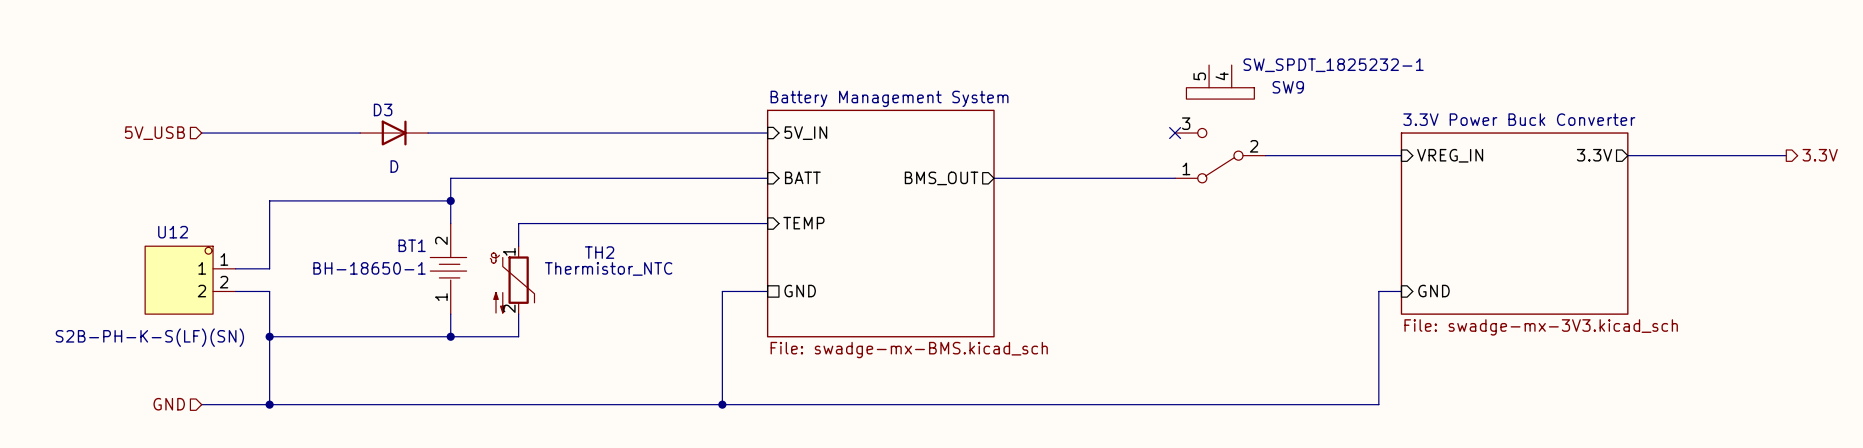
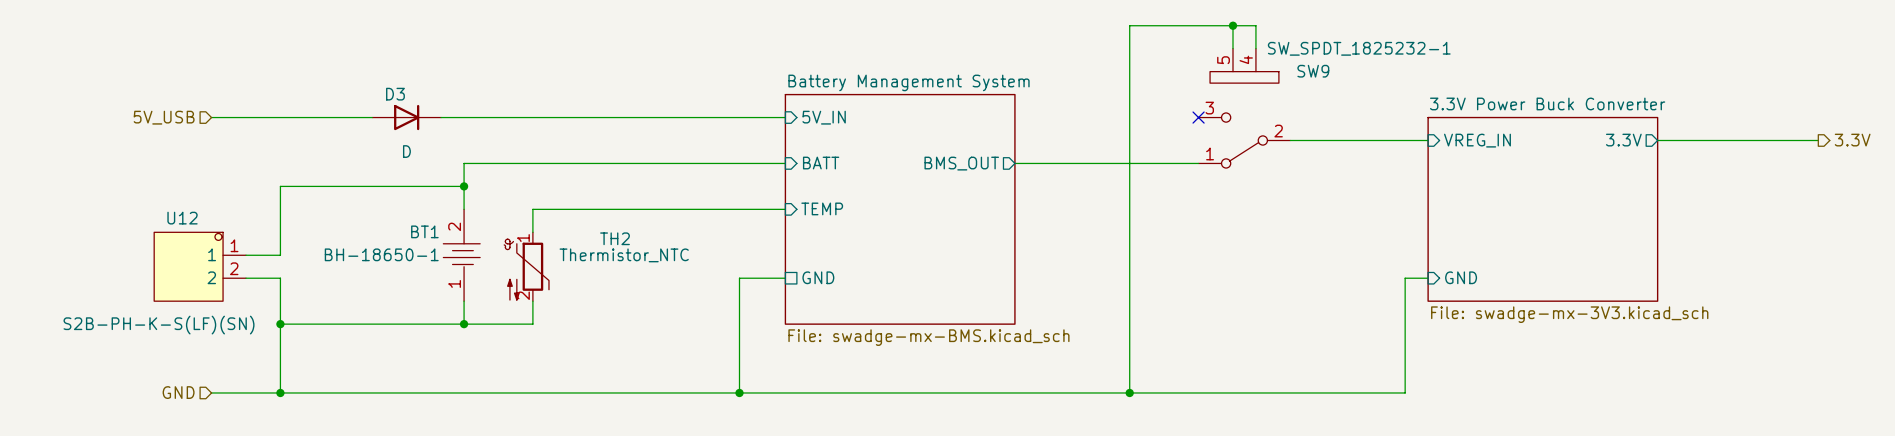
wire: none -> (1233, 25) (1233, 48)
junction: none -> (1233, 25)
wire: none -> (1255, 48) (1255, 25) (1129, 25) (1129, 392)
junction: none -> (1129, 392)

